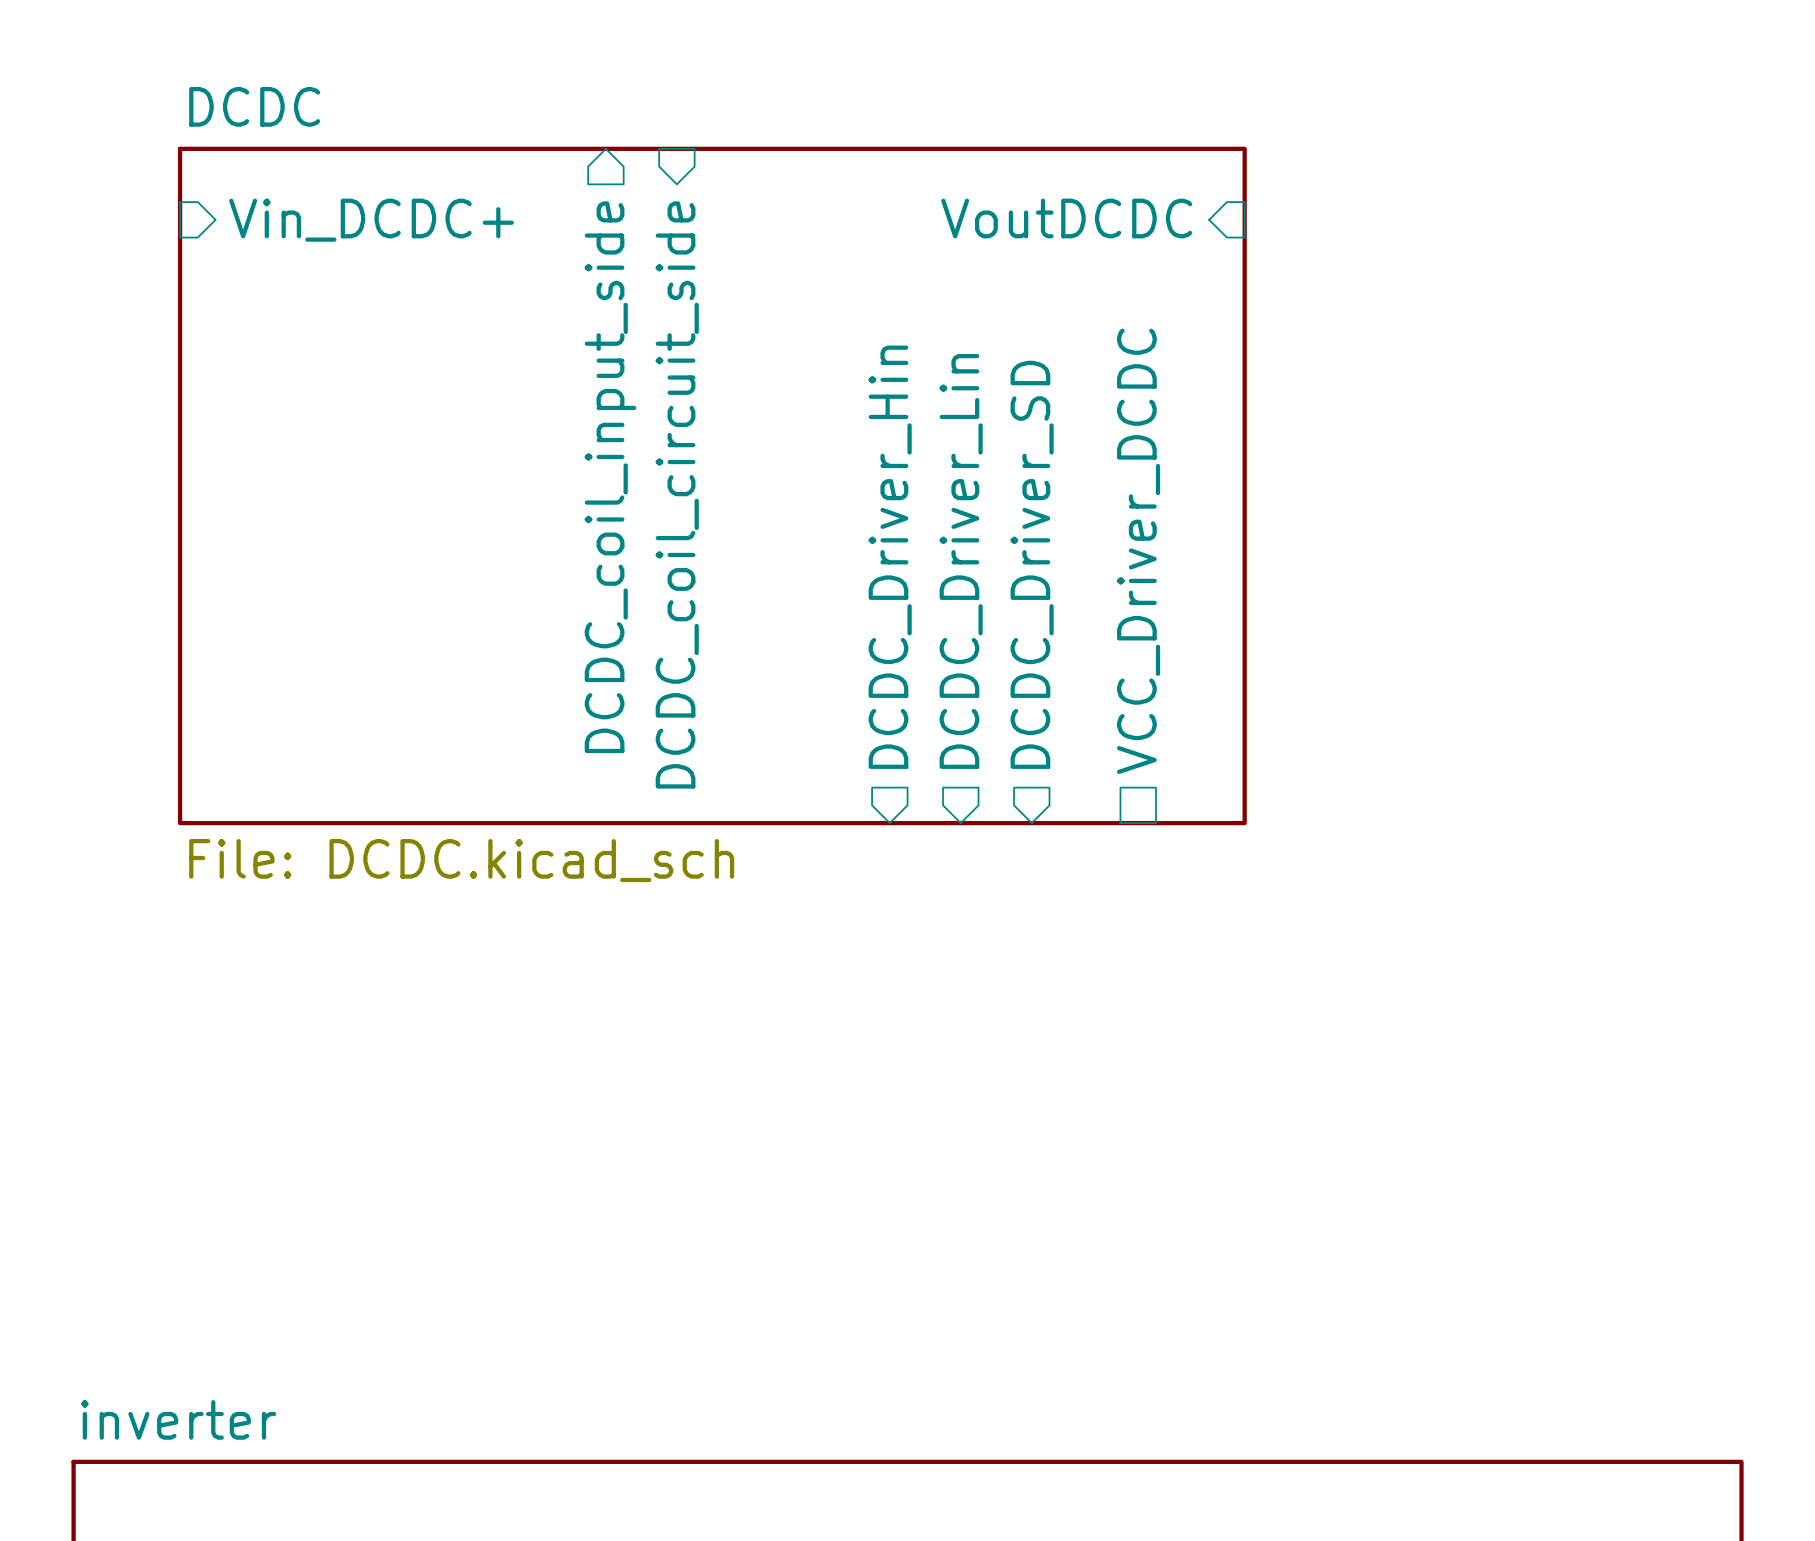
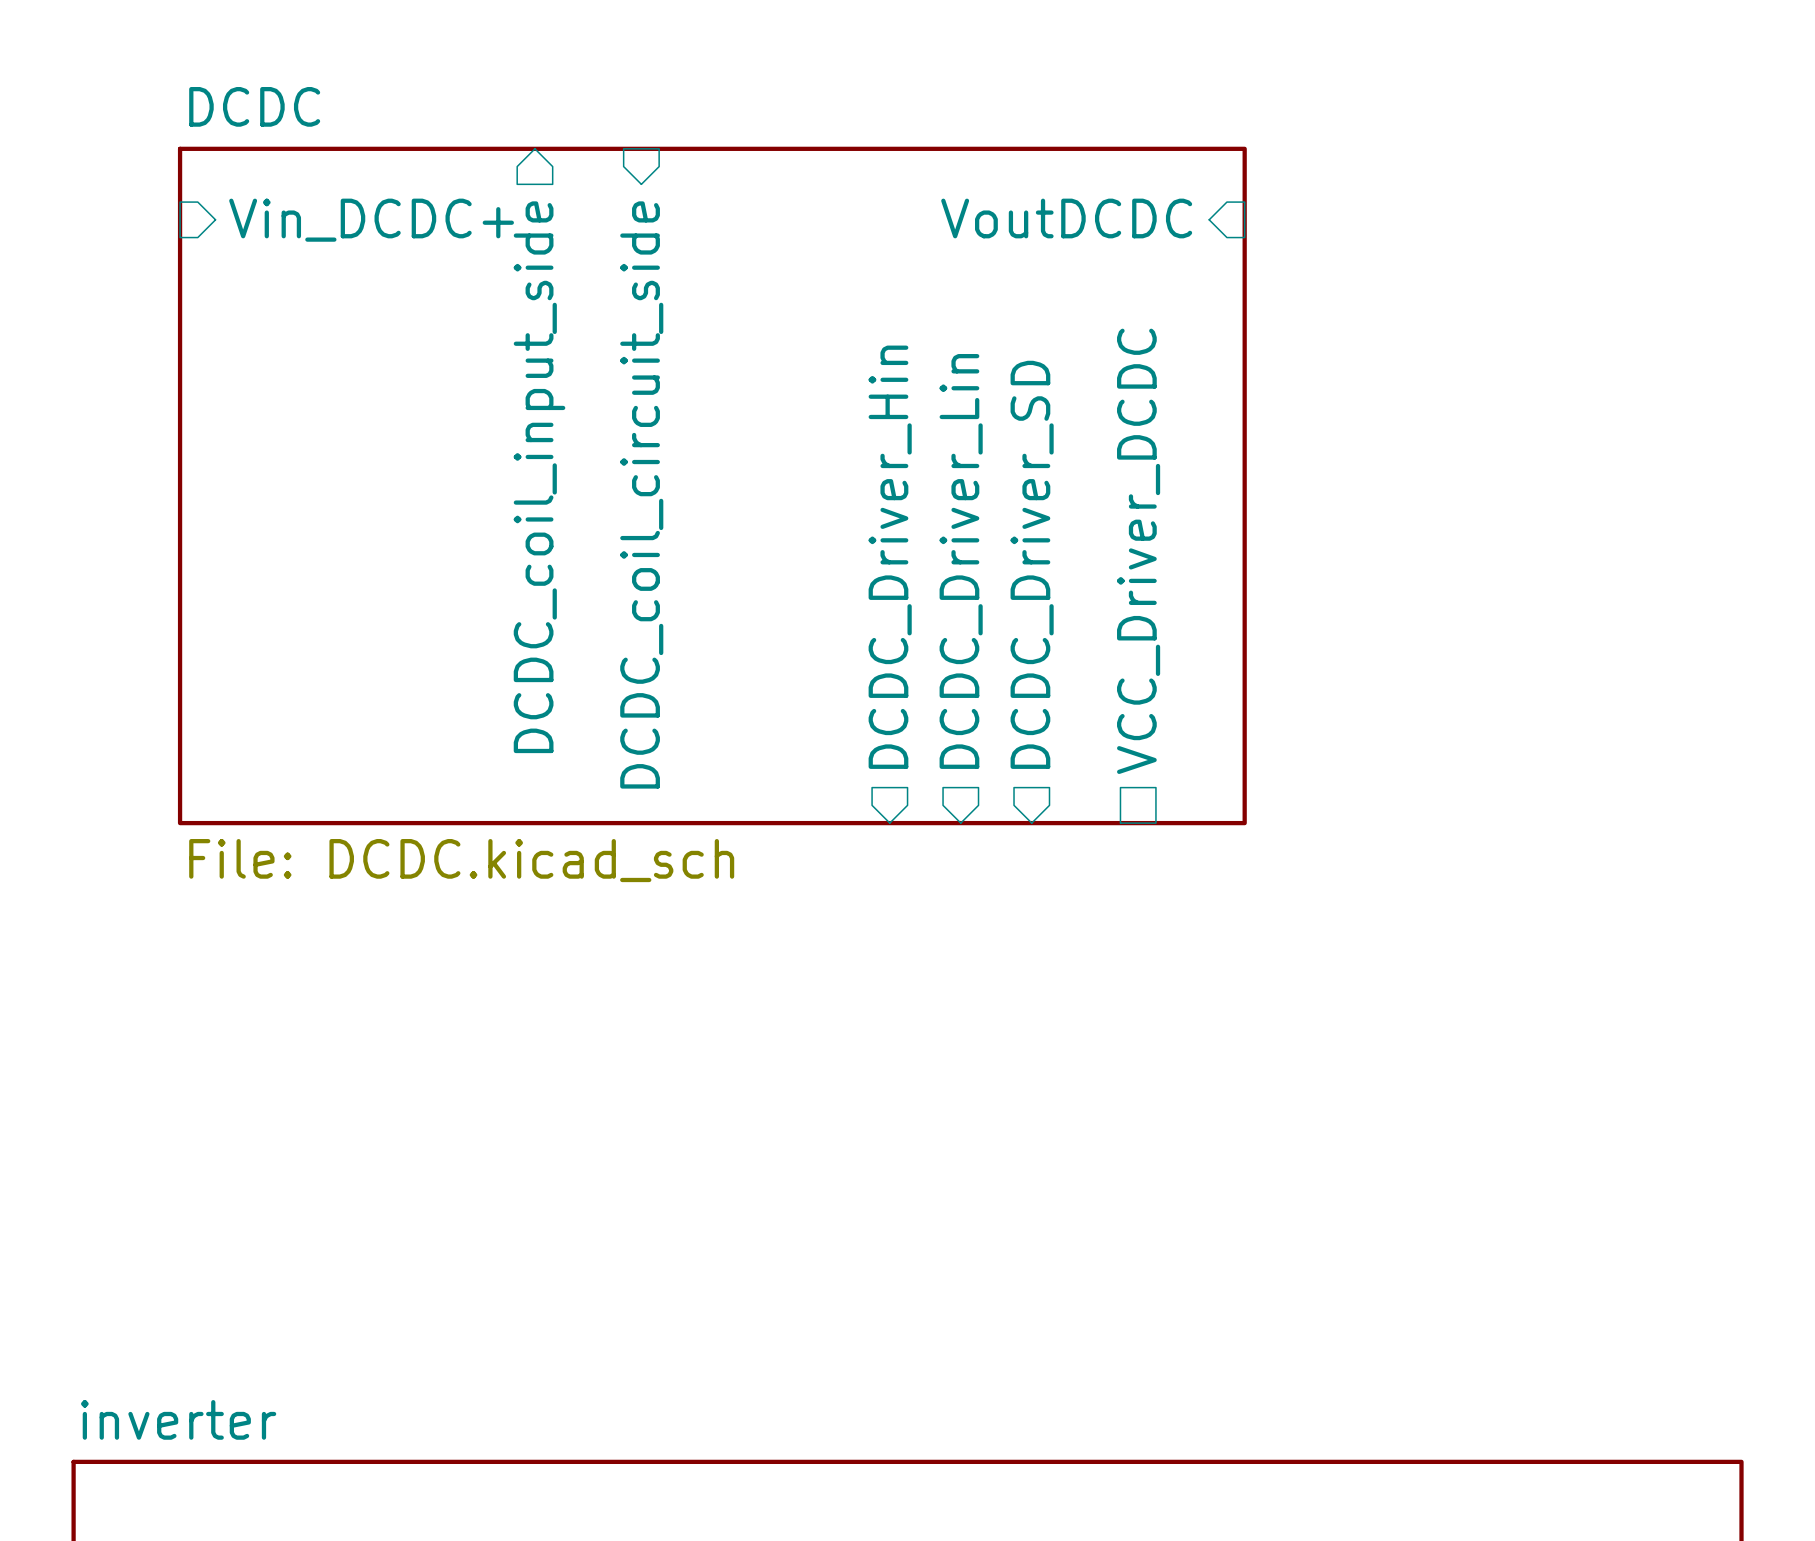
sheet pin position: DCDC_coil_input_side (610, 477) -> DCDC_coil_input_side (539, 477)
sheet pin position: DCDC_coil_circuit_side (677, 494) -> DCDC_coil_circuit_side (641, 494)

